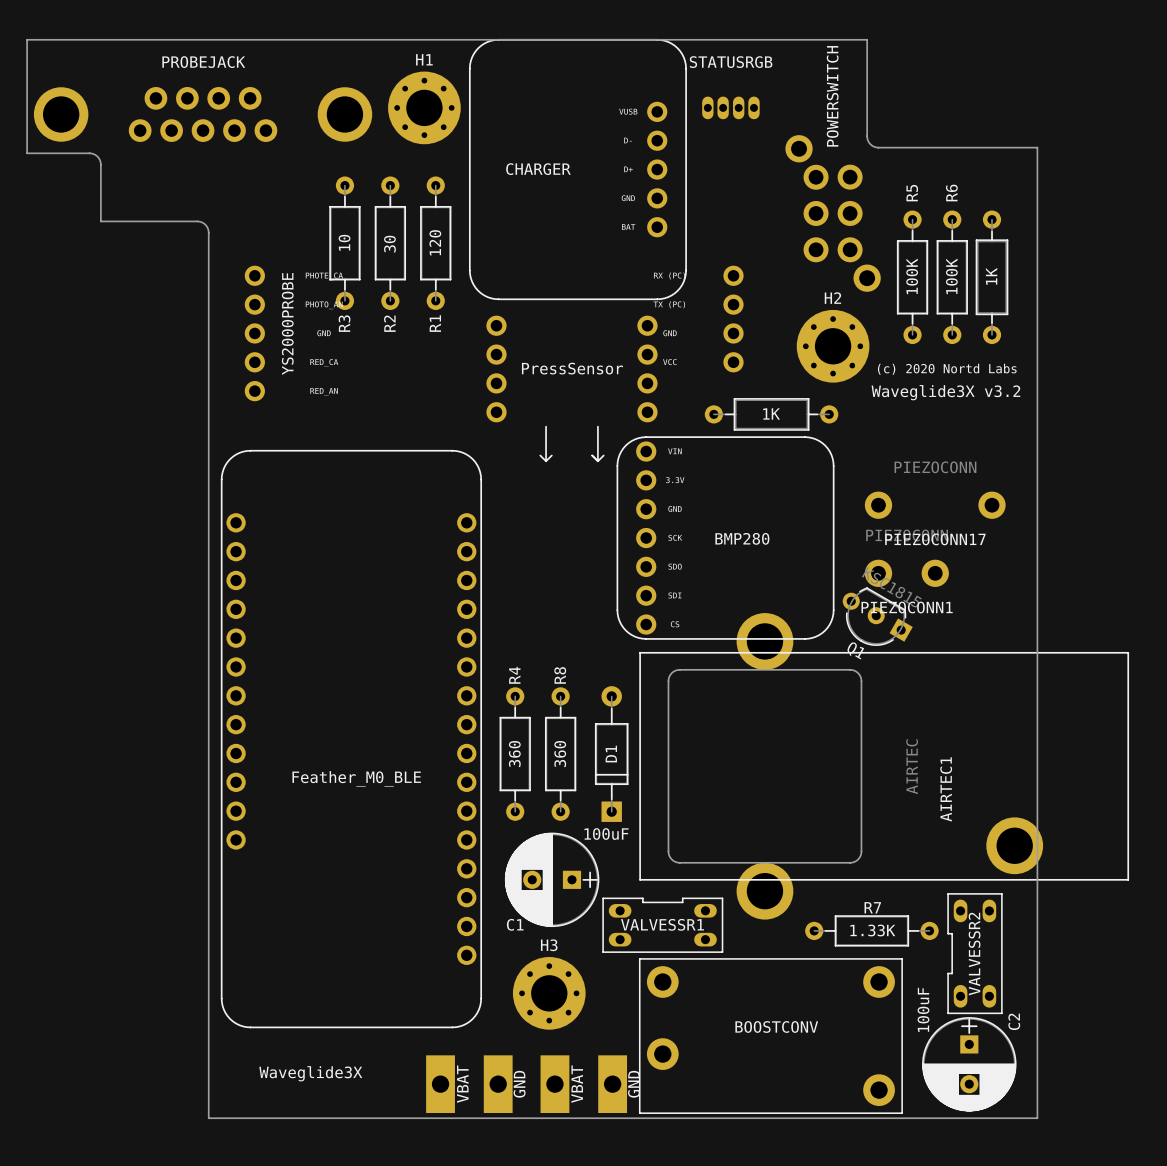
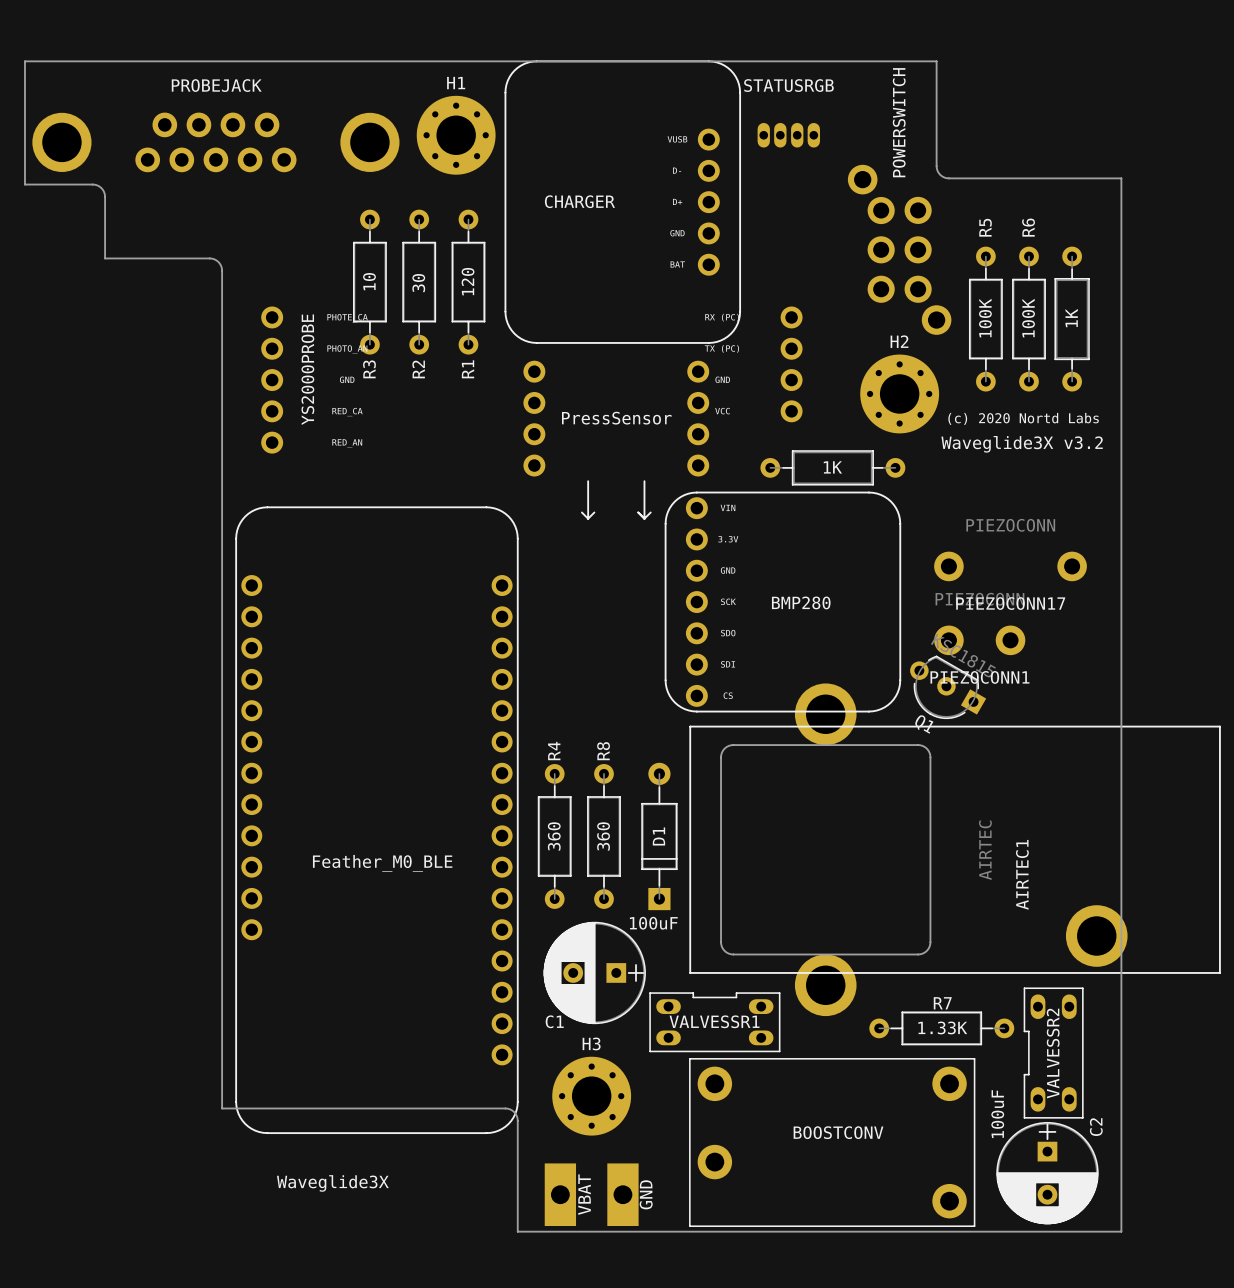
board edge: (208, 1004) (208, 1118) (481, 1118) -> (222, 1108) (510, 1109) (515, 1113) (517, 1120) (517, 1231)
part: (469, 1084) -> none
part position: (583, 1084) -> (591, 1194)

